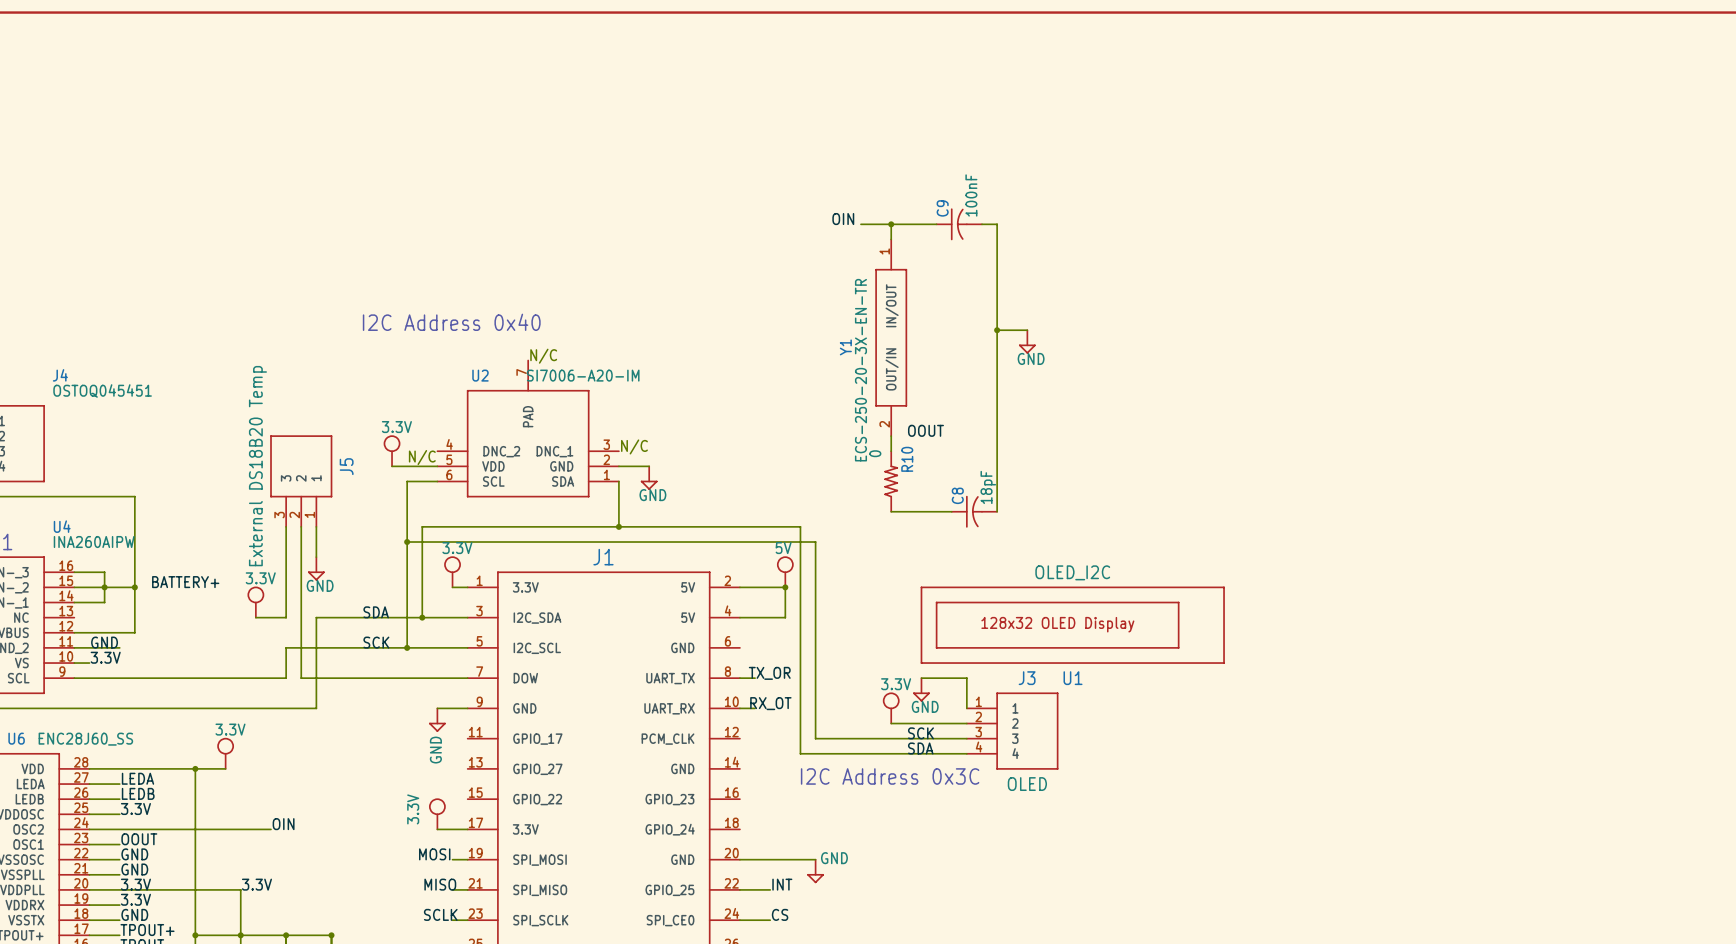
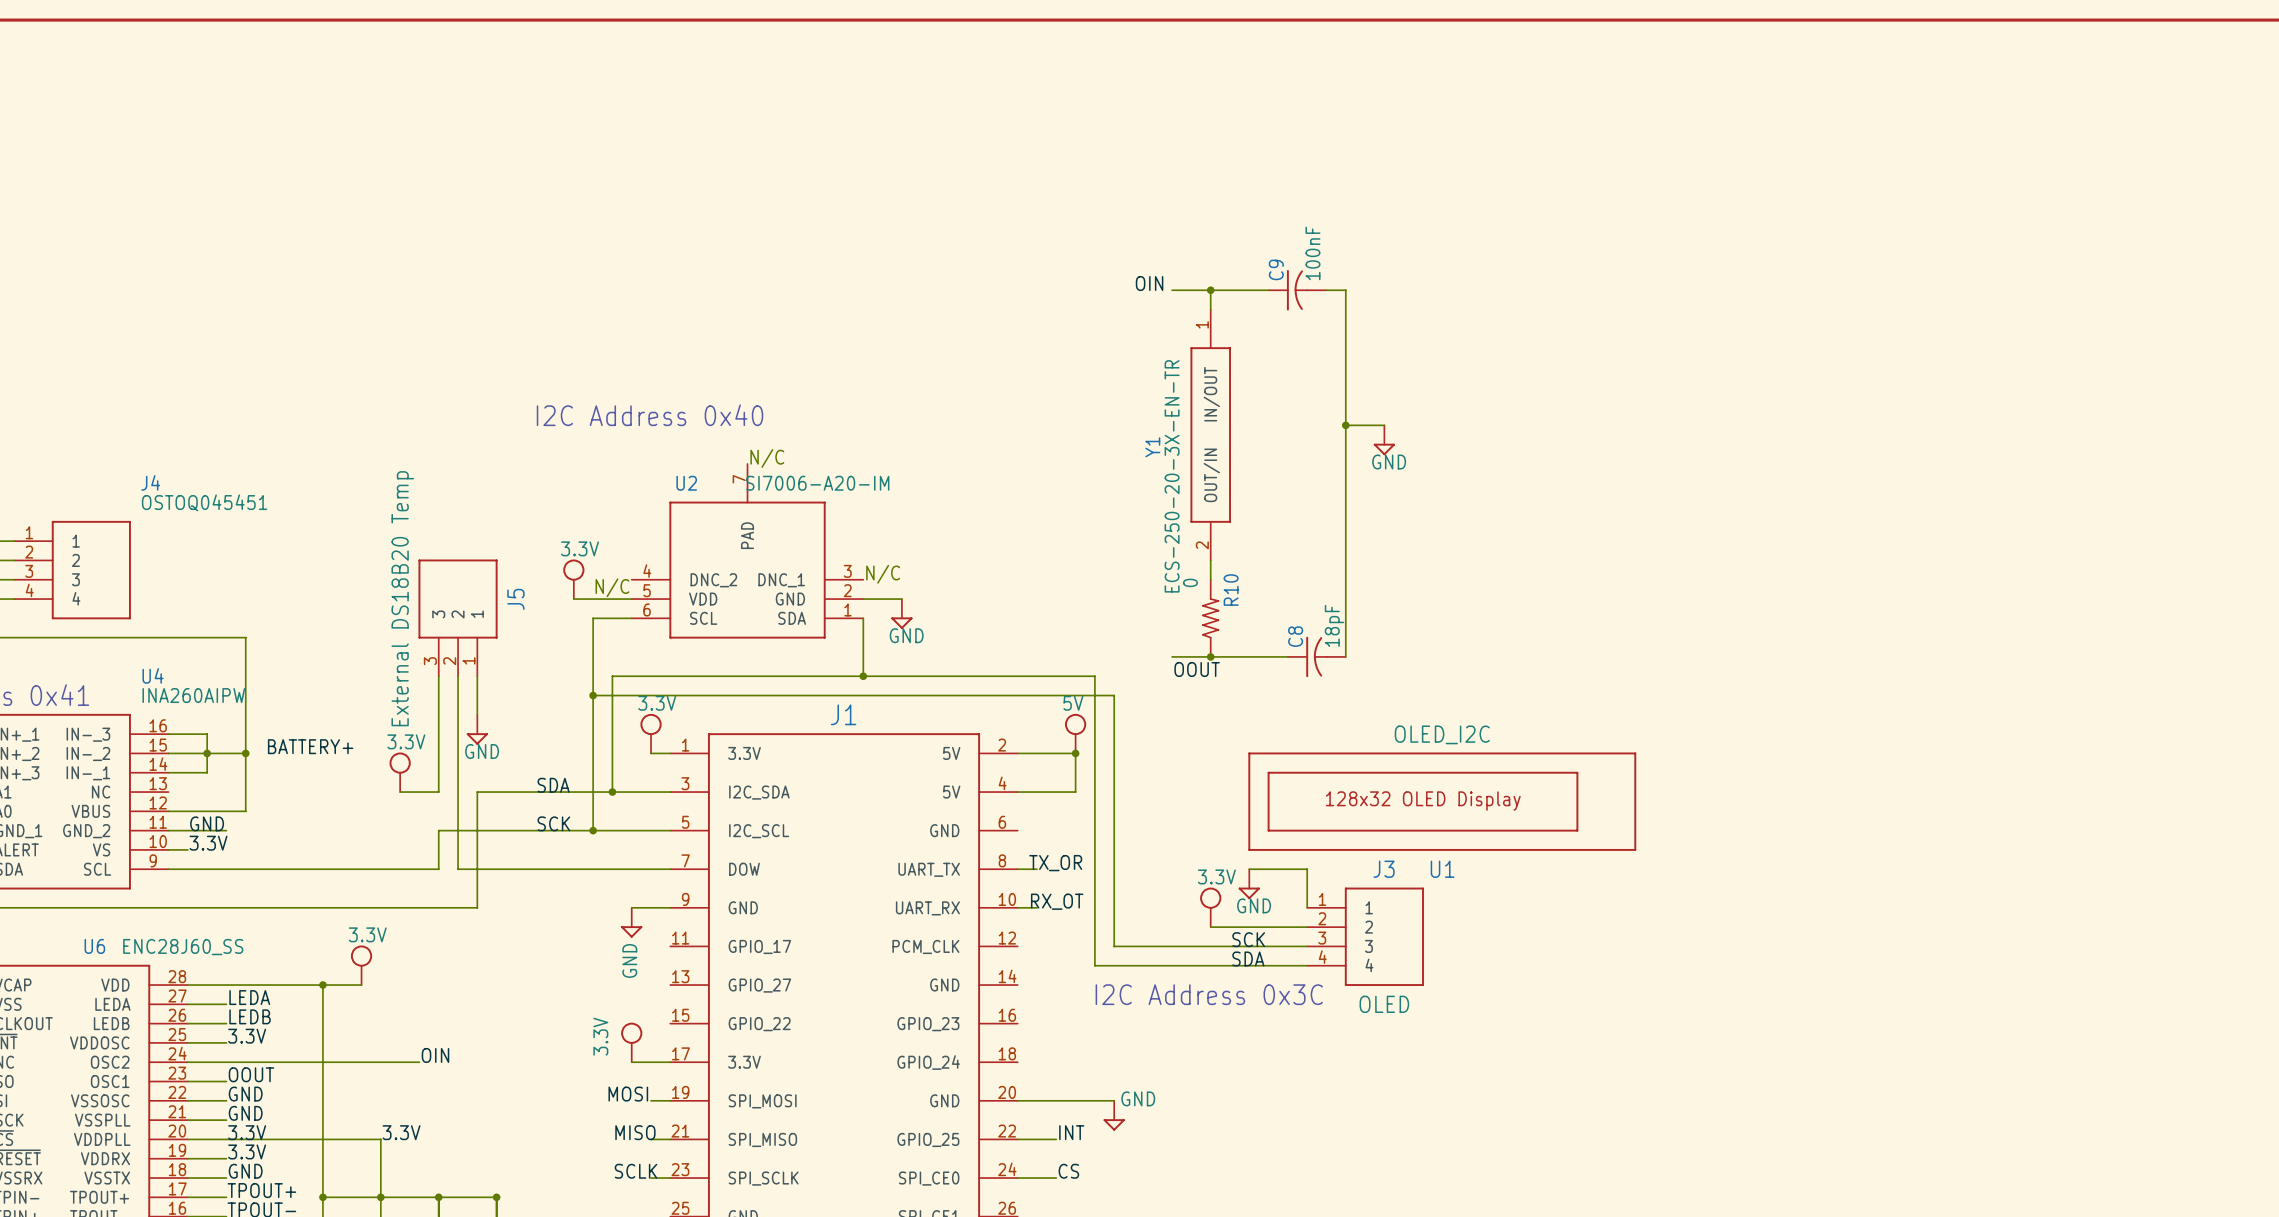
label position: OOUT (925, 430) -> OOUT (1197, 669)
wire: none -> (1172, 656) (1210, 656)
junction: none -> (1210, 656)

